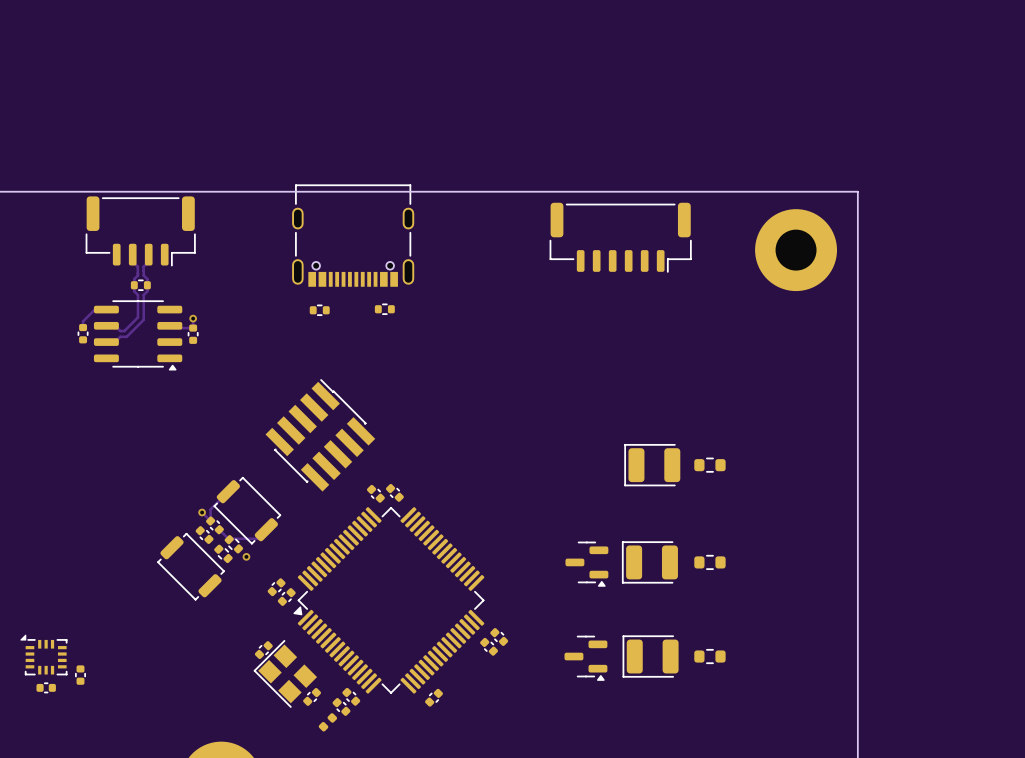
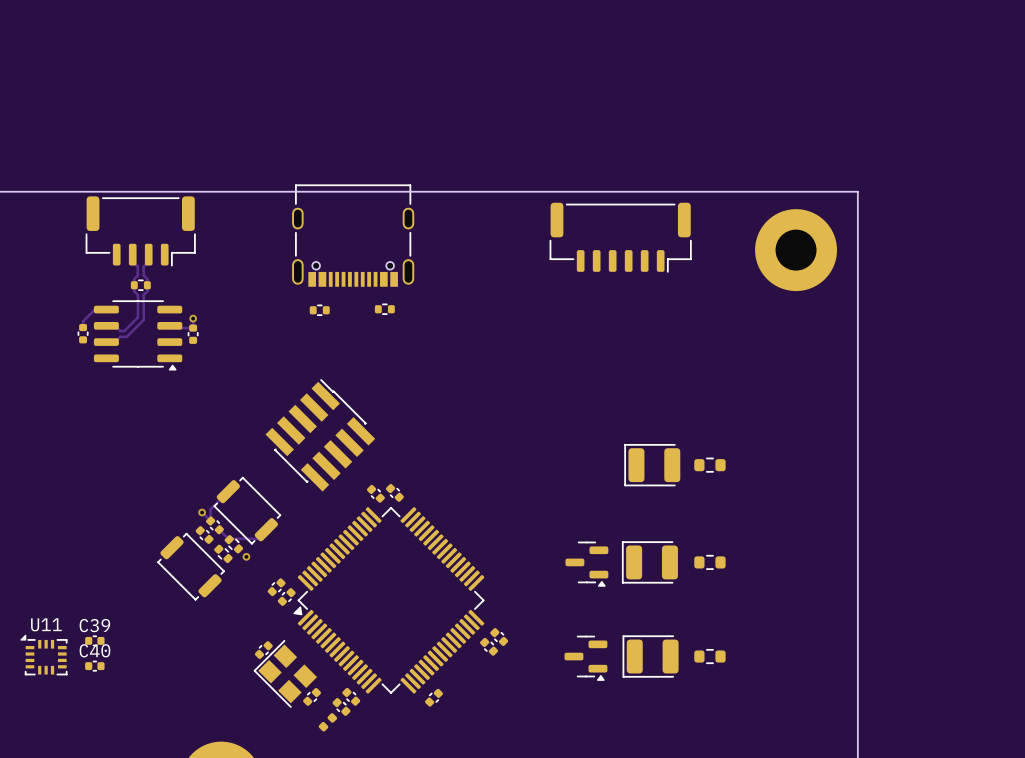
U11 name: none -> U11 (46, 624)
C39: none -> (94, 640)
C40: none -> (94, 666)
part: (80, 675) -> none
part: (46, 687) -> none

